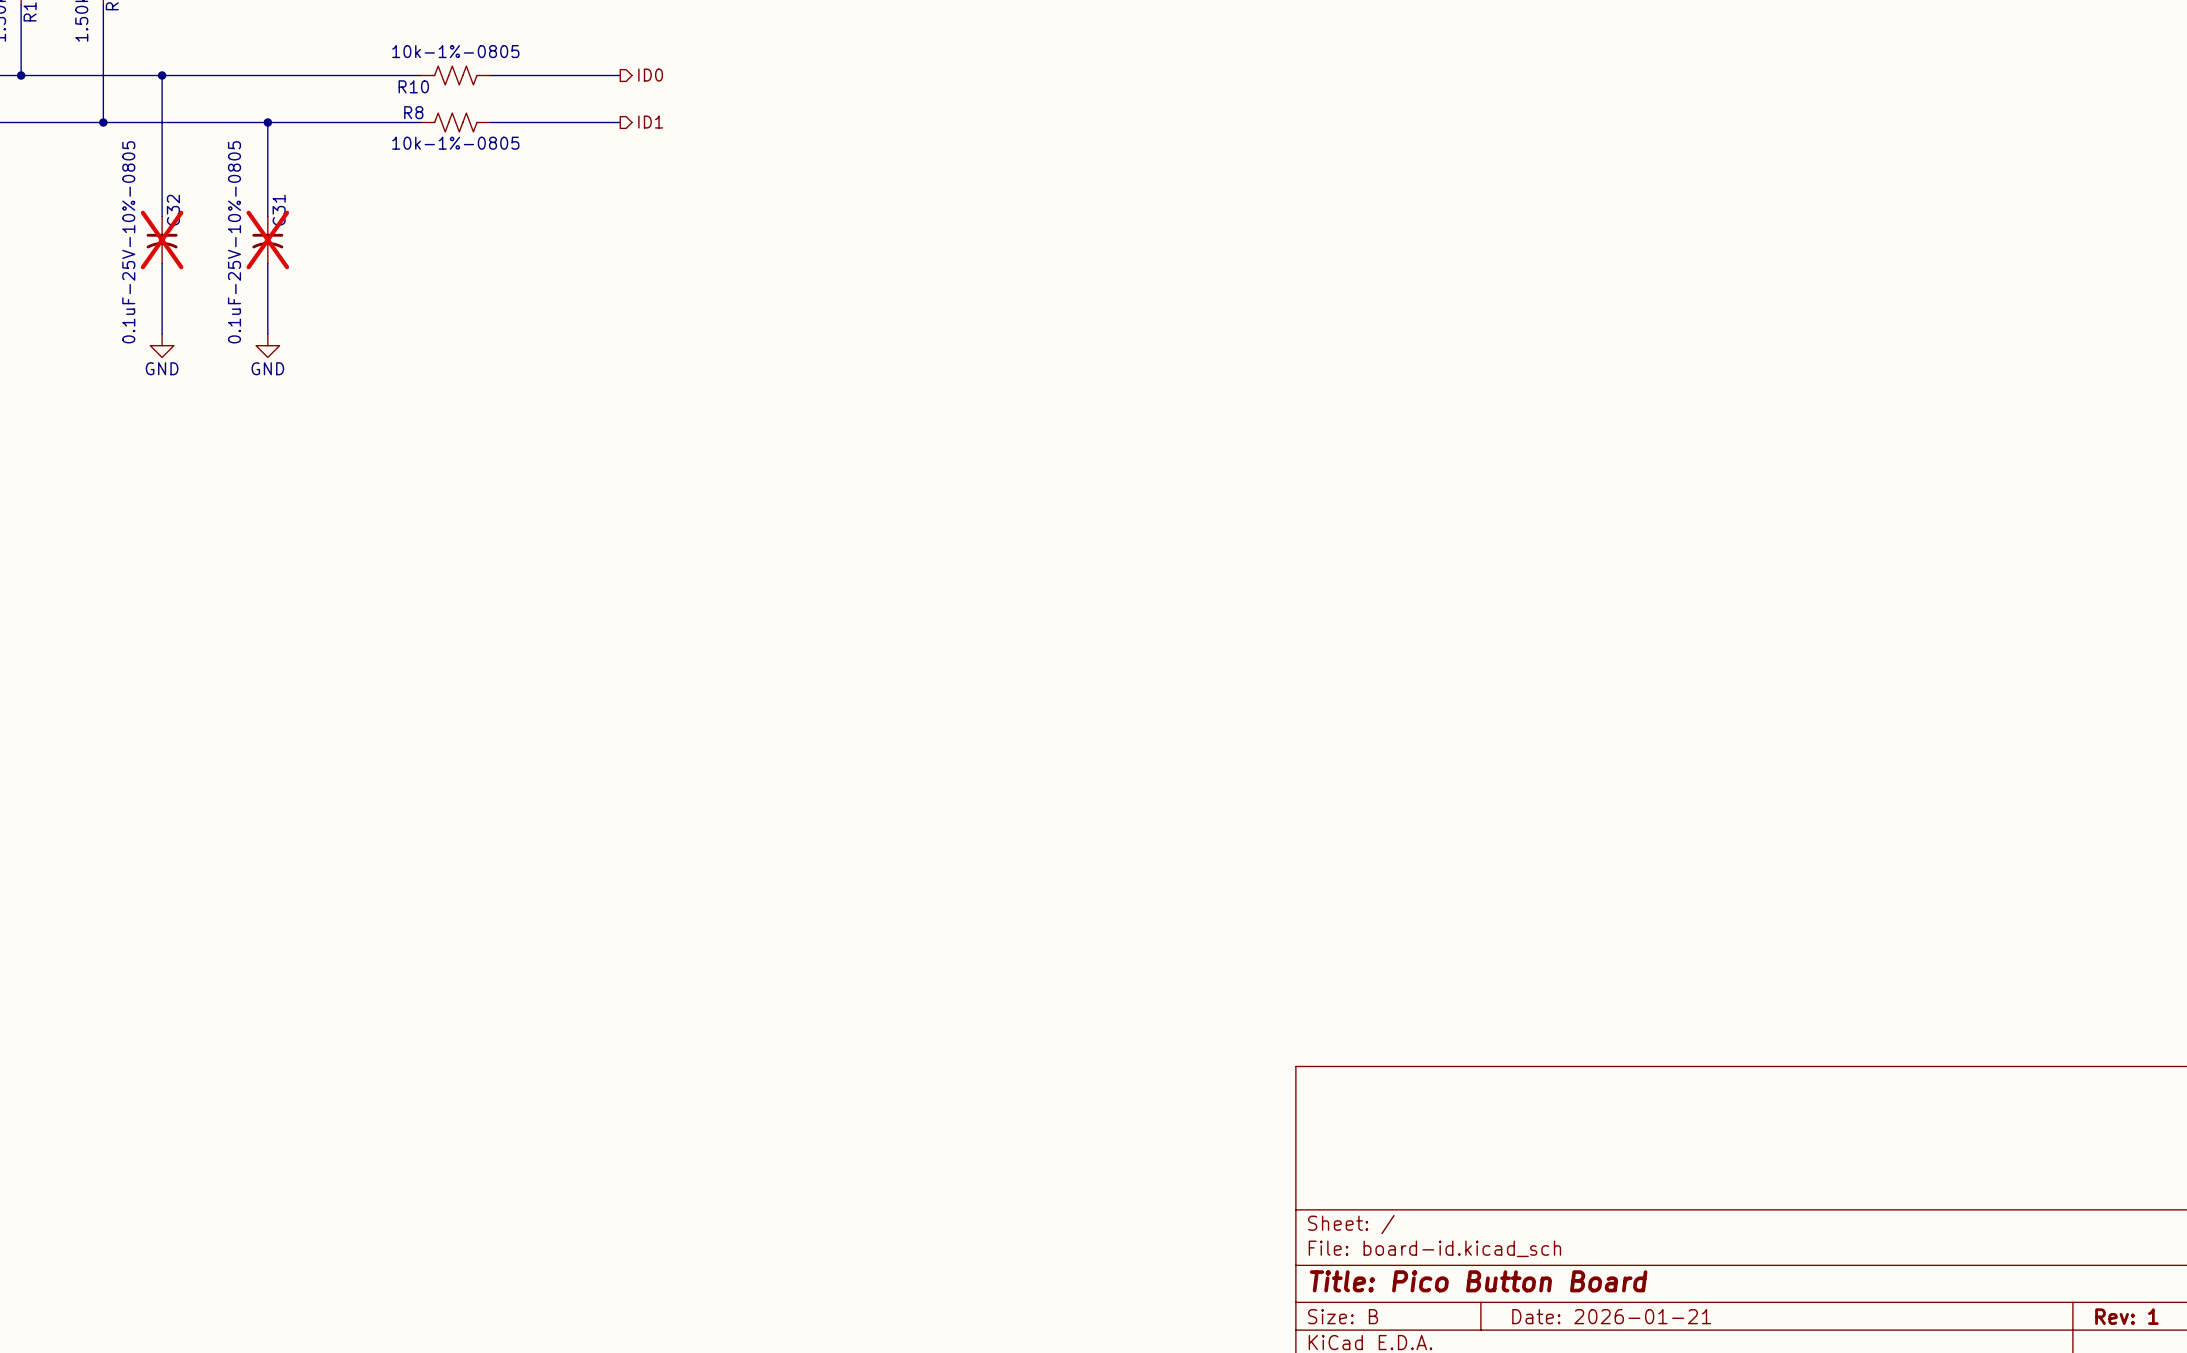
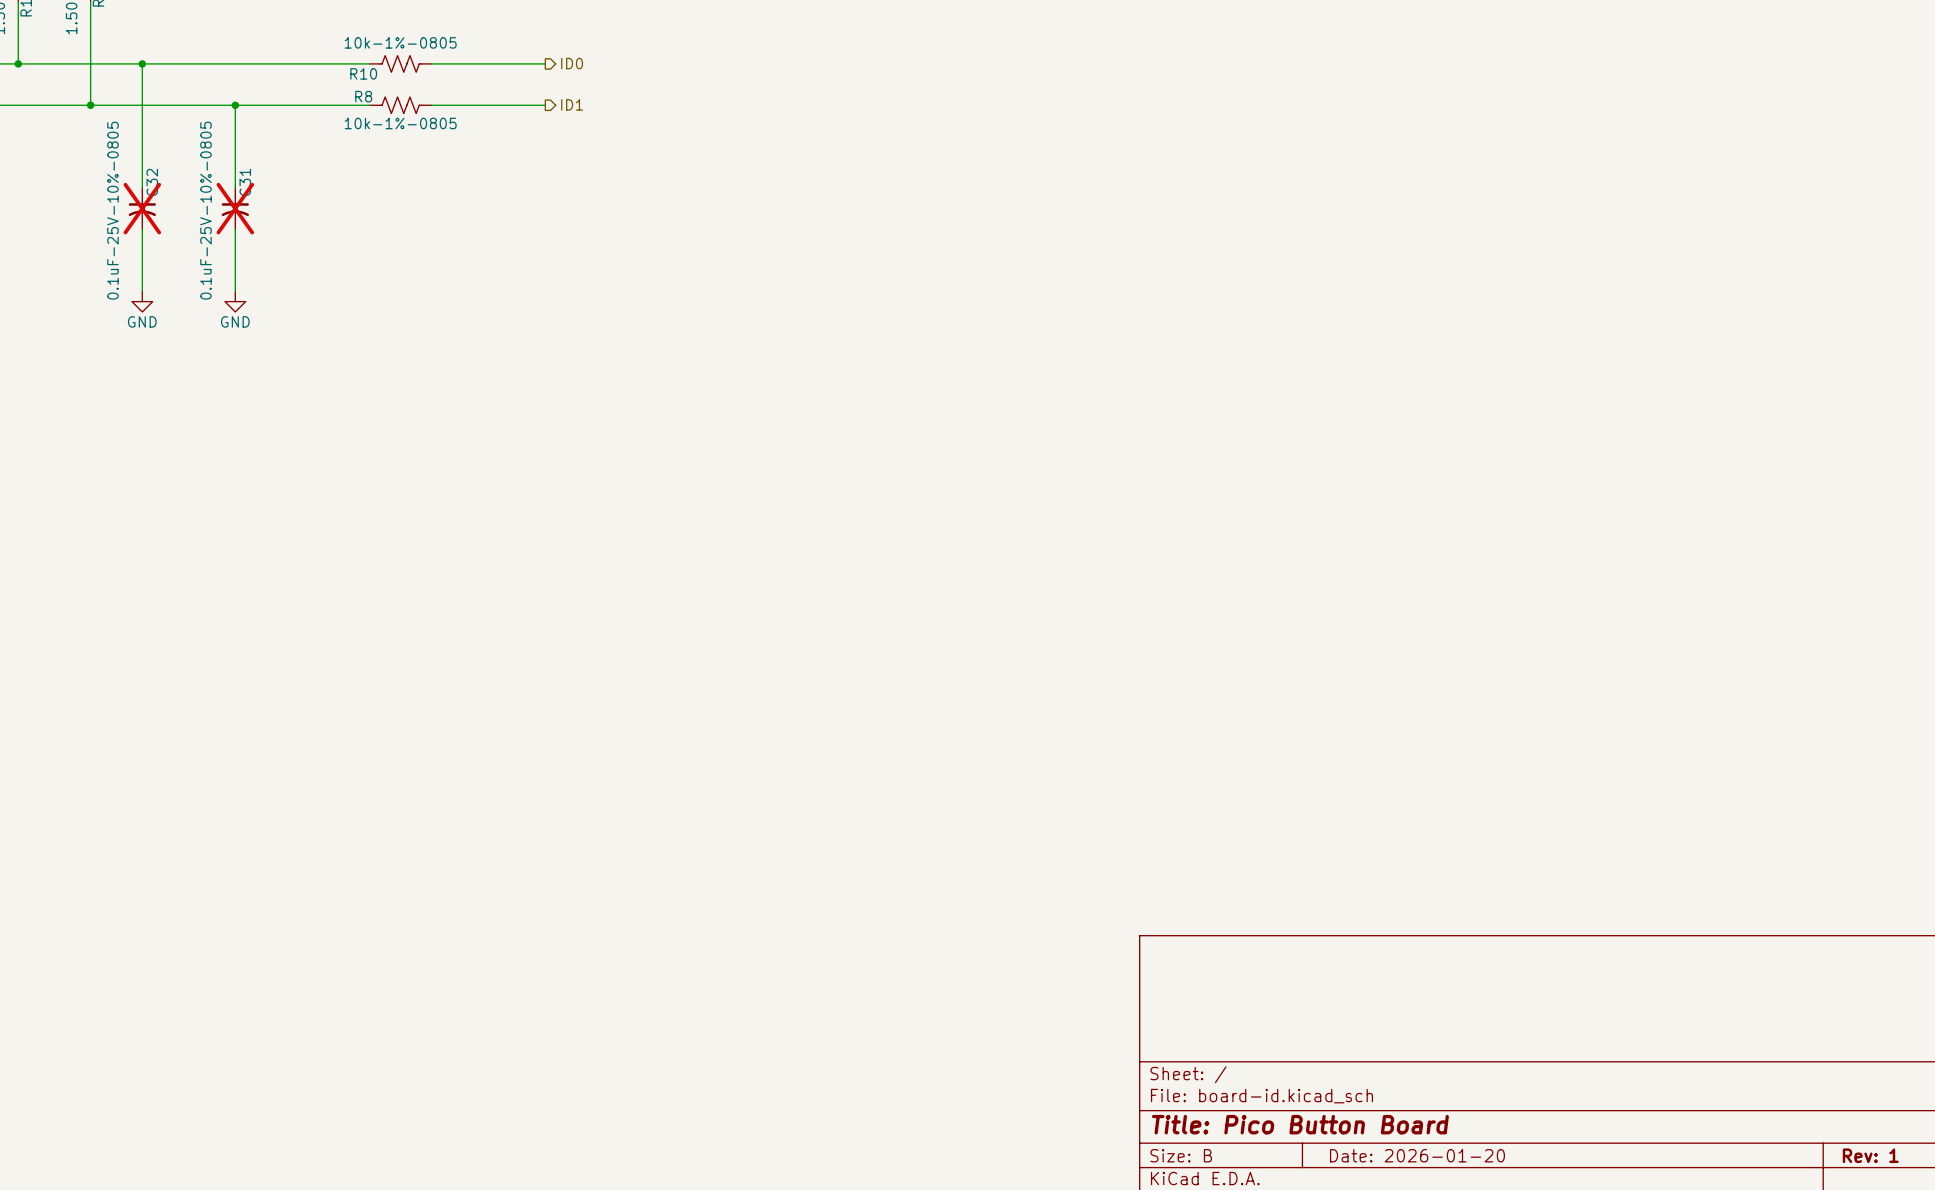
title block: Date: 2026-01-21 (1611, 1316) -> Date: 2026-01-20 (1417, 1155)

